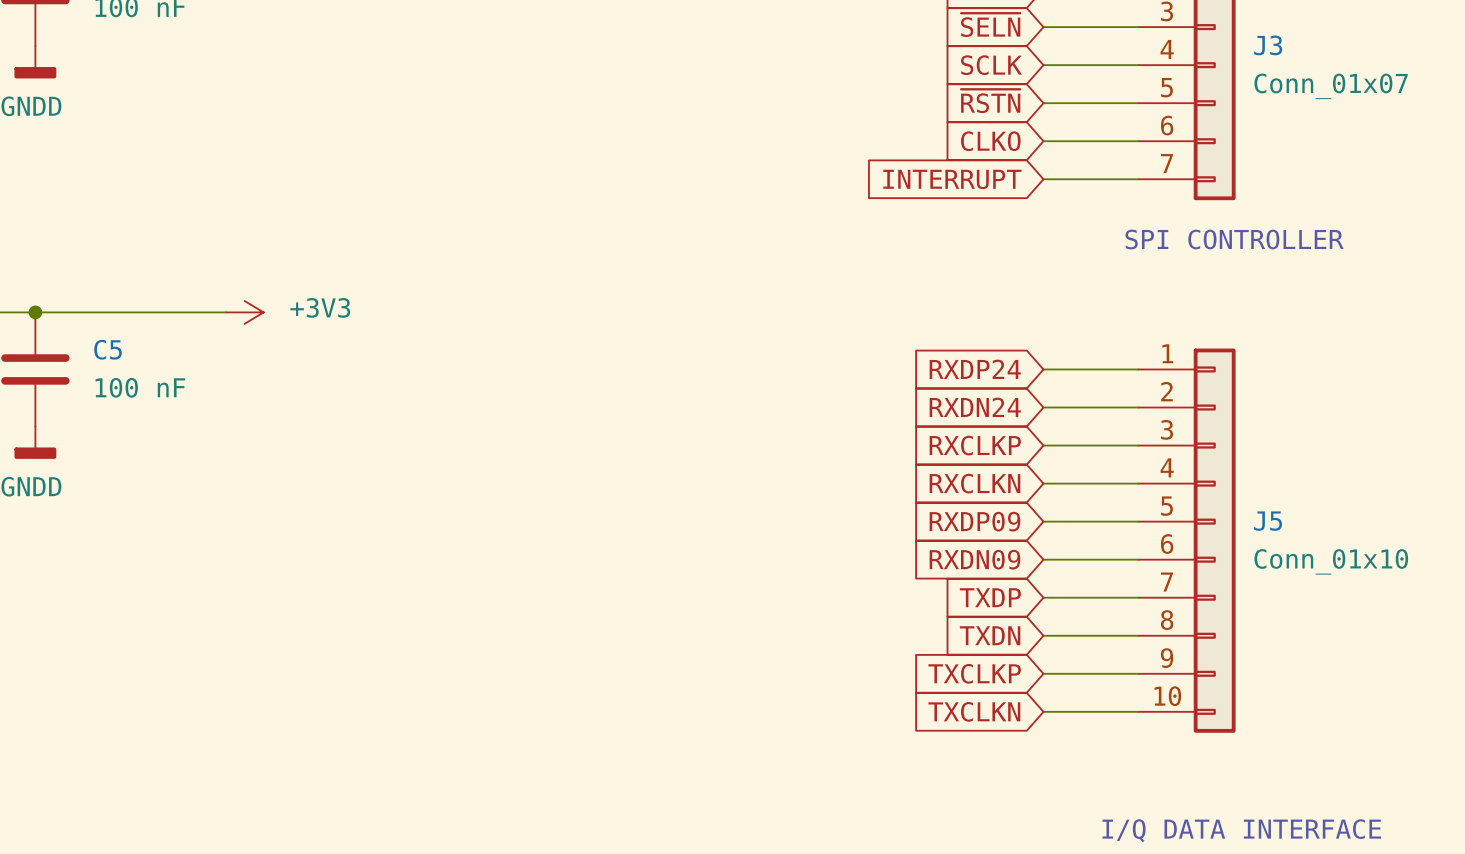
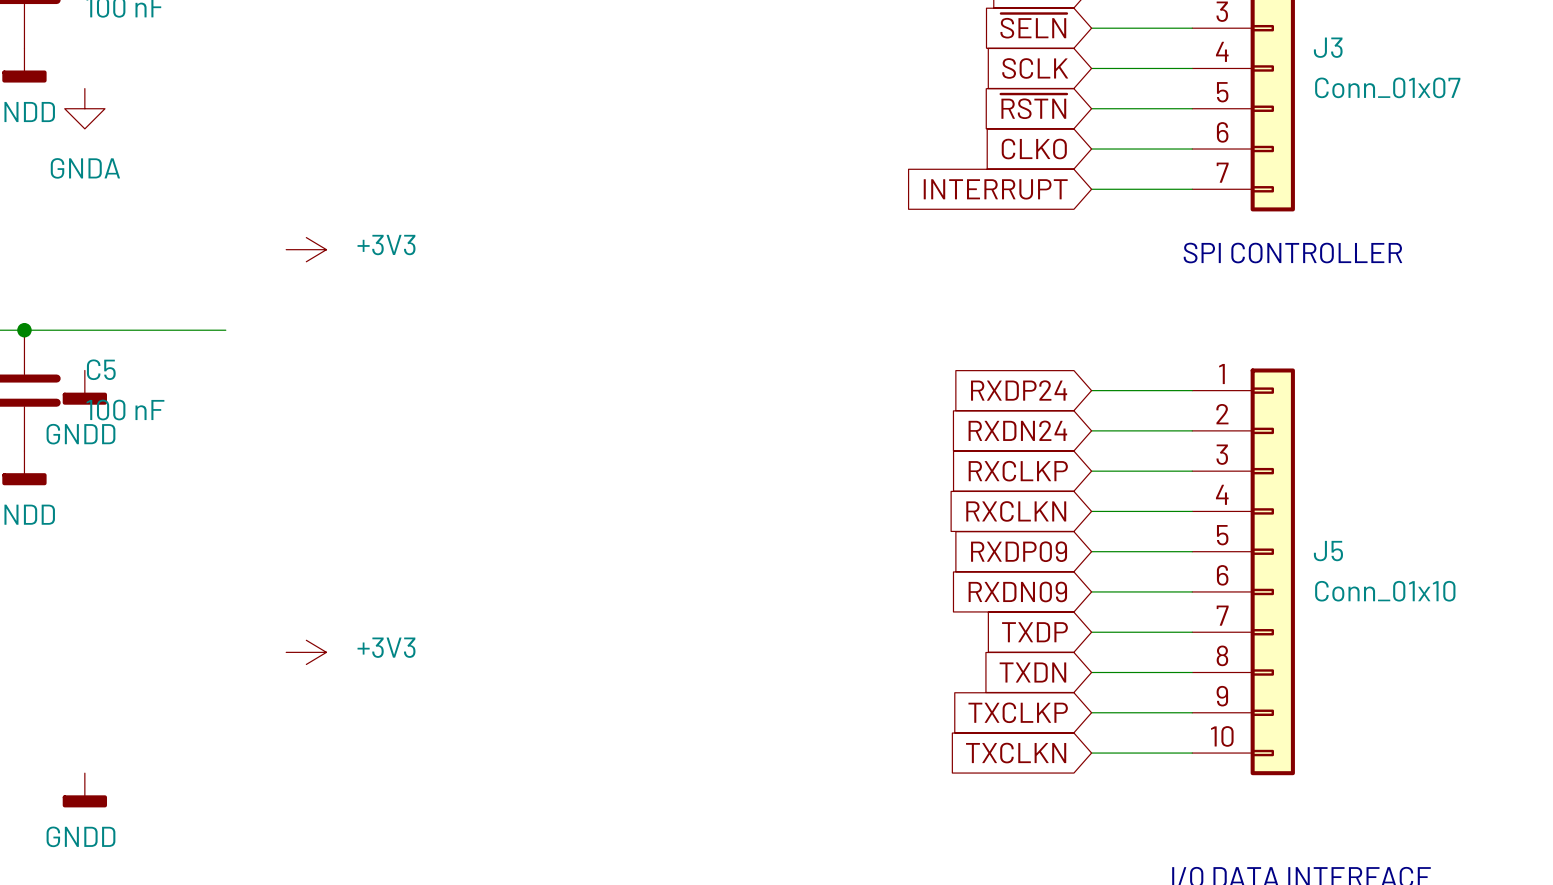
power symbol: none -> GNDA (84, 108)
power symbol position: +3V3 (244, 312) -> +3V3 (306, 249)
power symbol: none -> GNDD (84, 387)
power symbol: none -> +3V3 (306, 652)
power symbol: none -> GNDD (84, 790)

